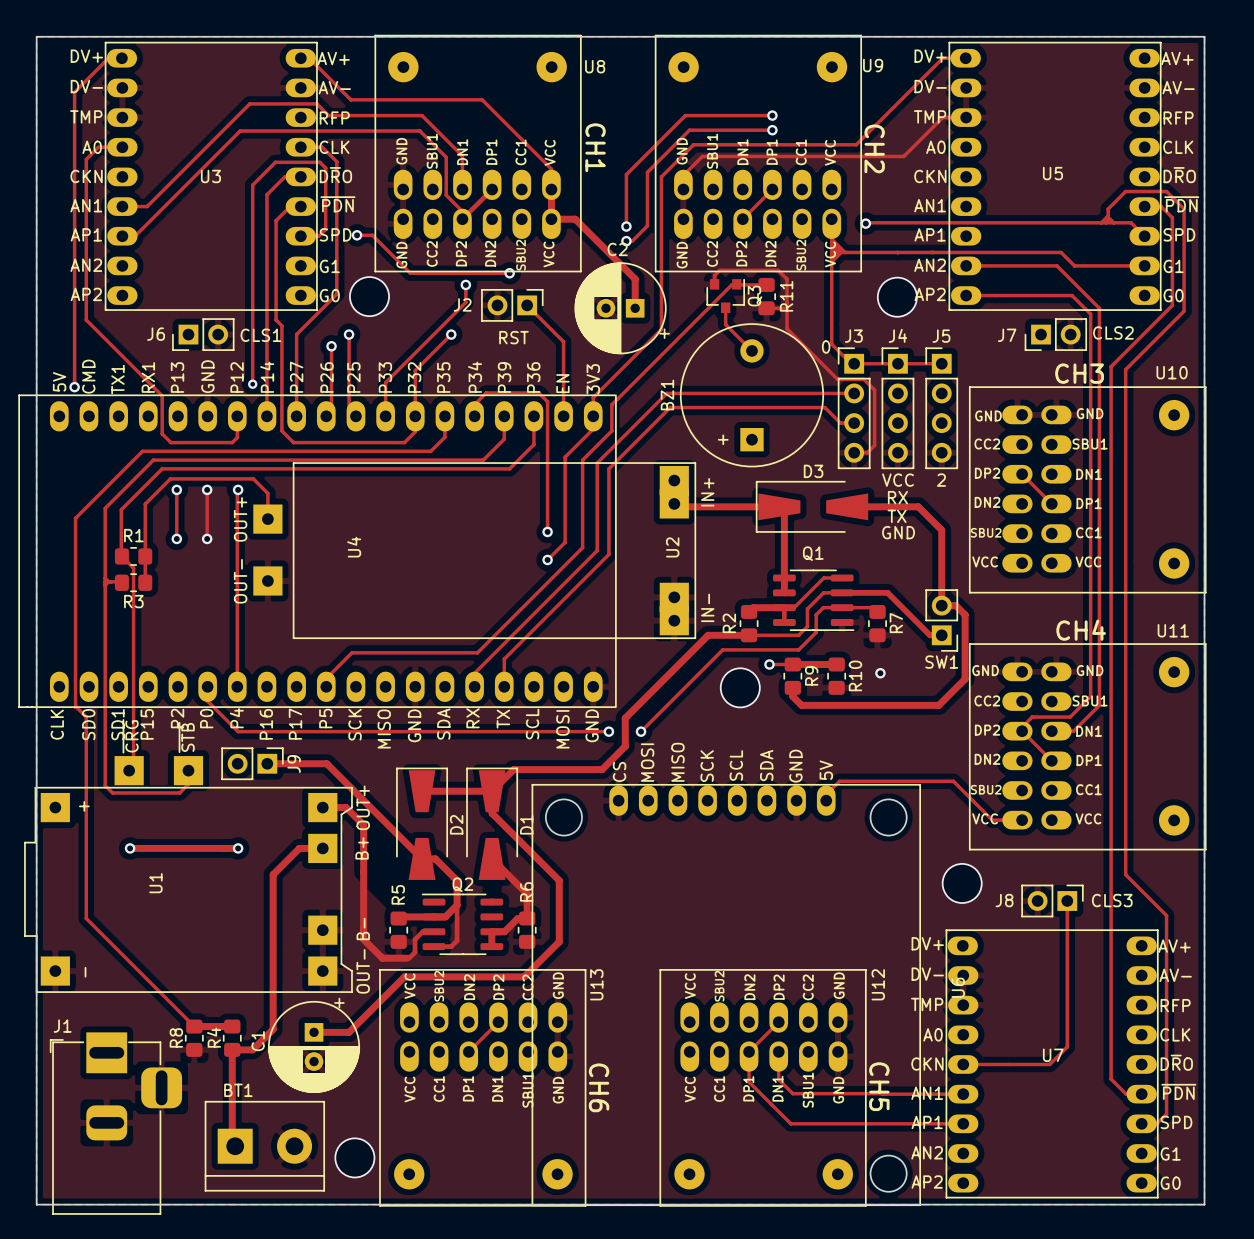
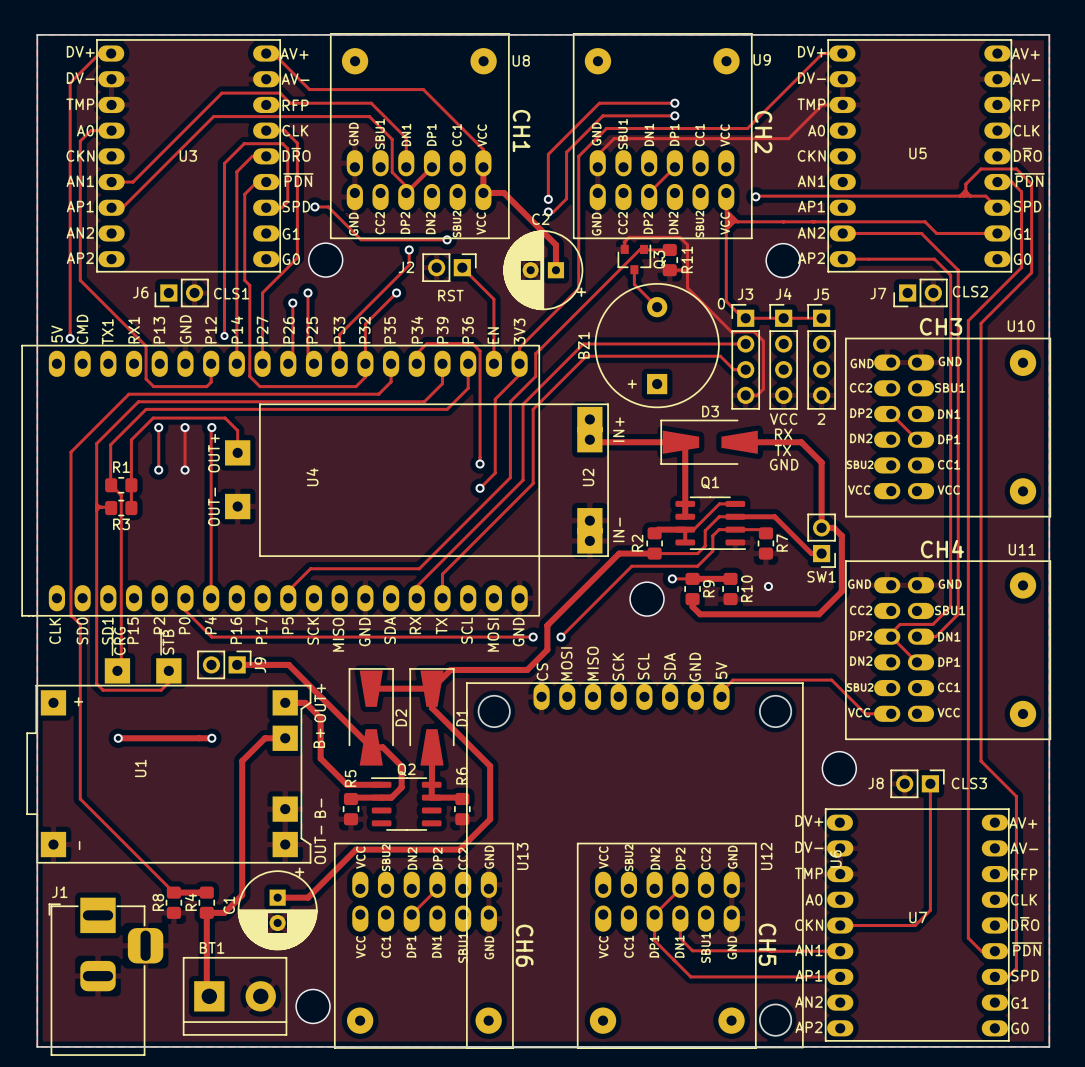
track: (492, 858) (527, 893) (527, 918) (517, 918) (504, 931) (491, 931) (491, 946) -> (431, 747) (431, 784)
track: (363, 871) (363, 939) (382, 958) (409, 958) (415, 952) (415, 939) (422, 931) (434, 931) -> (320, 758) (346, 784) (381, 784)
track: none -> (431, 784) (431, 797) (460, 797)
track: (457, 905) (457, 940) (451, 946) (434, 946) -> none

